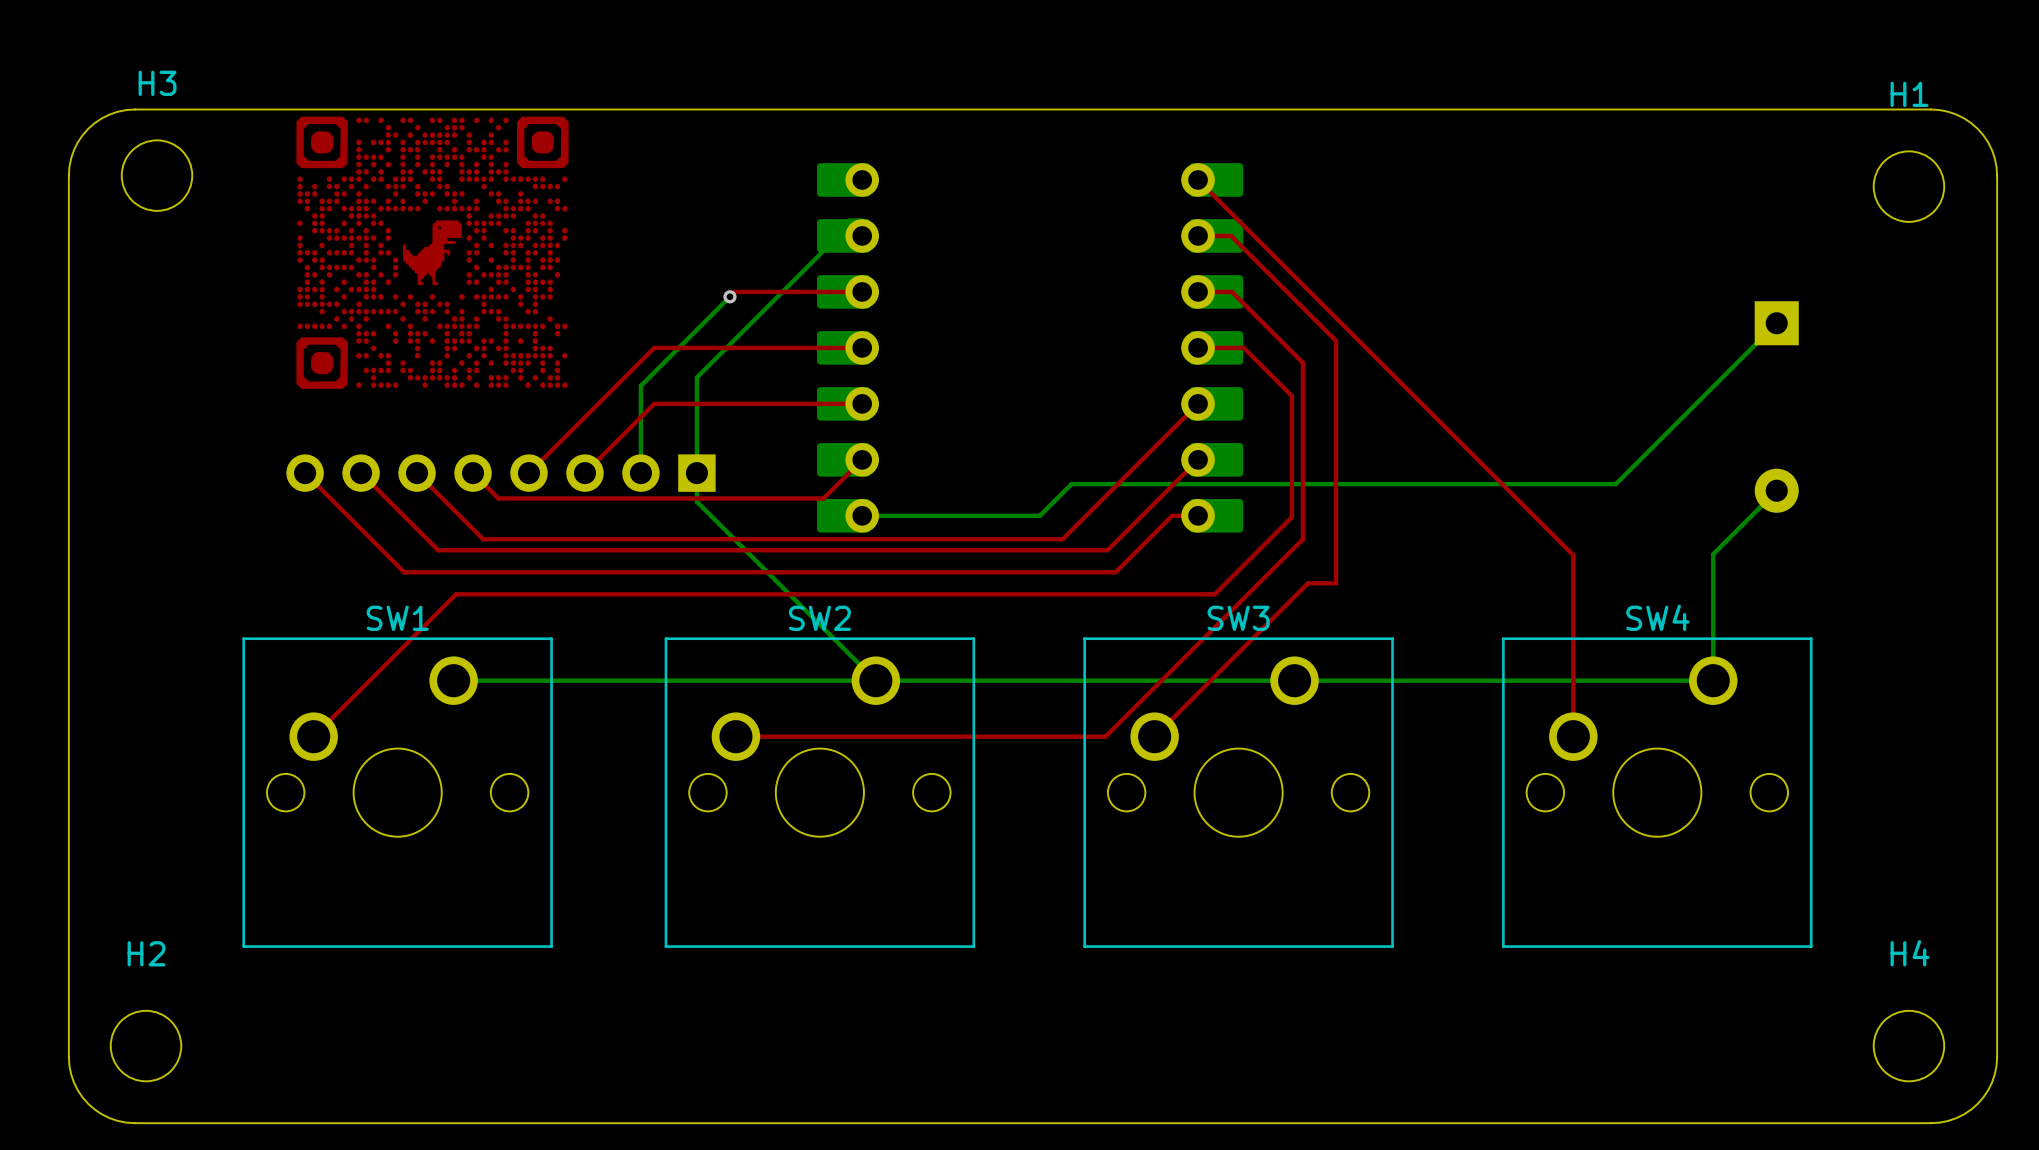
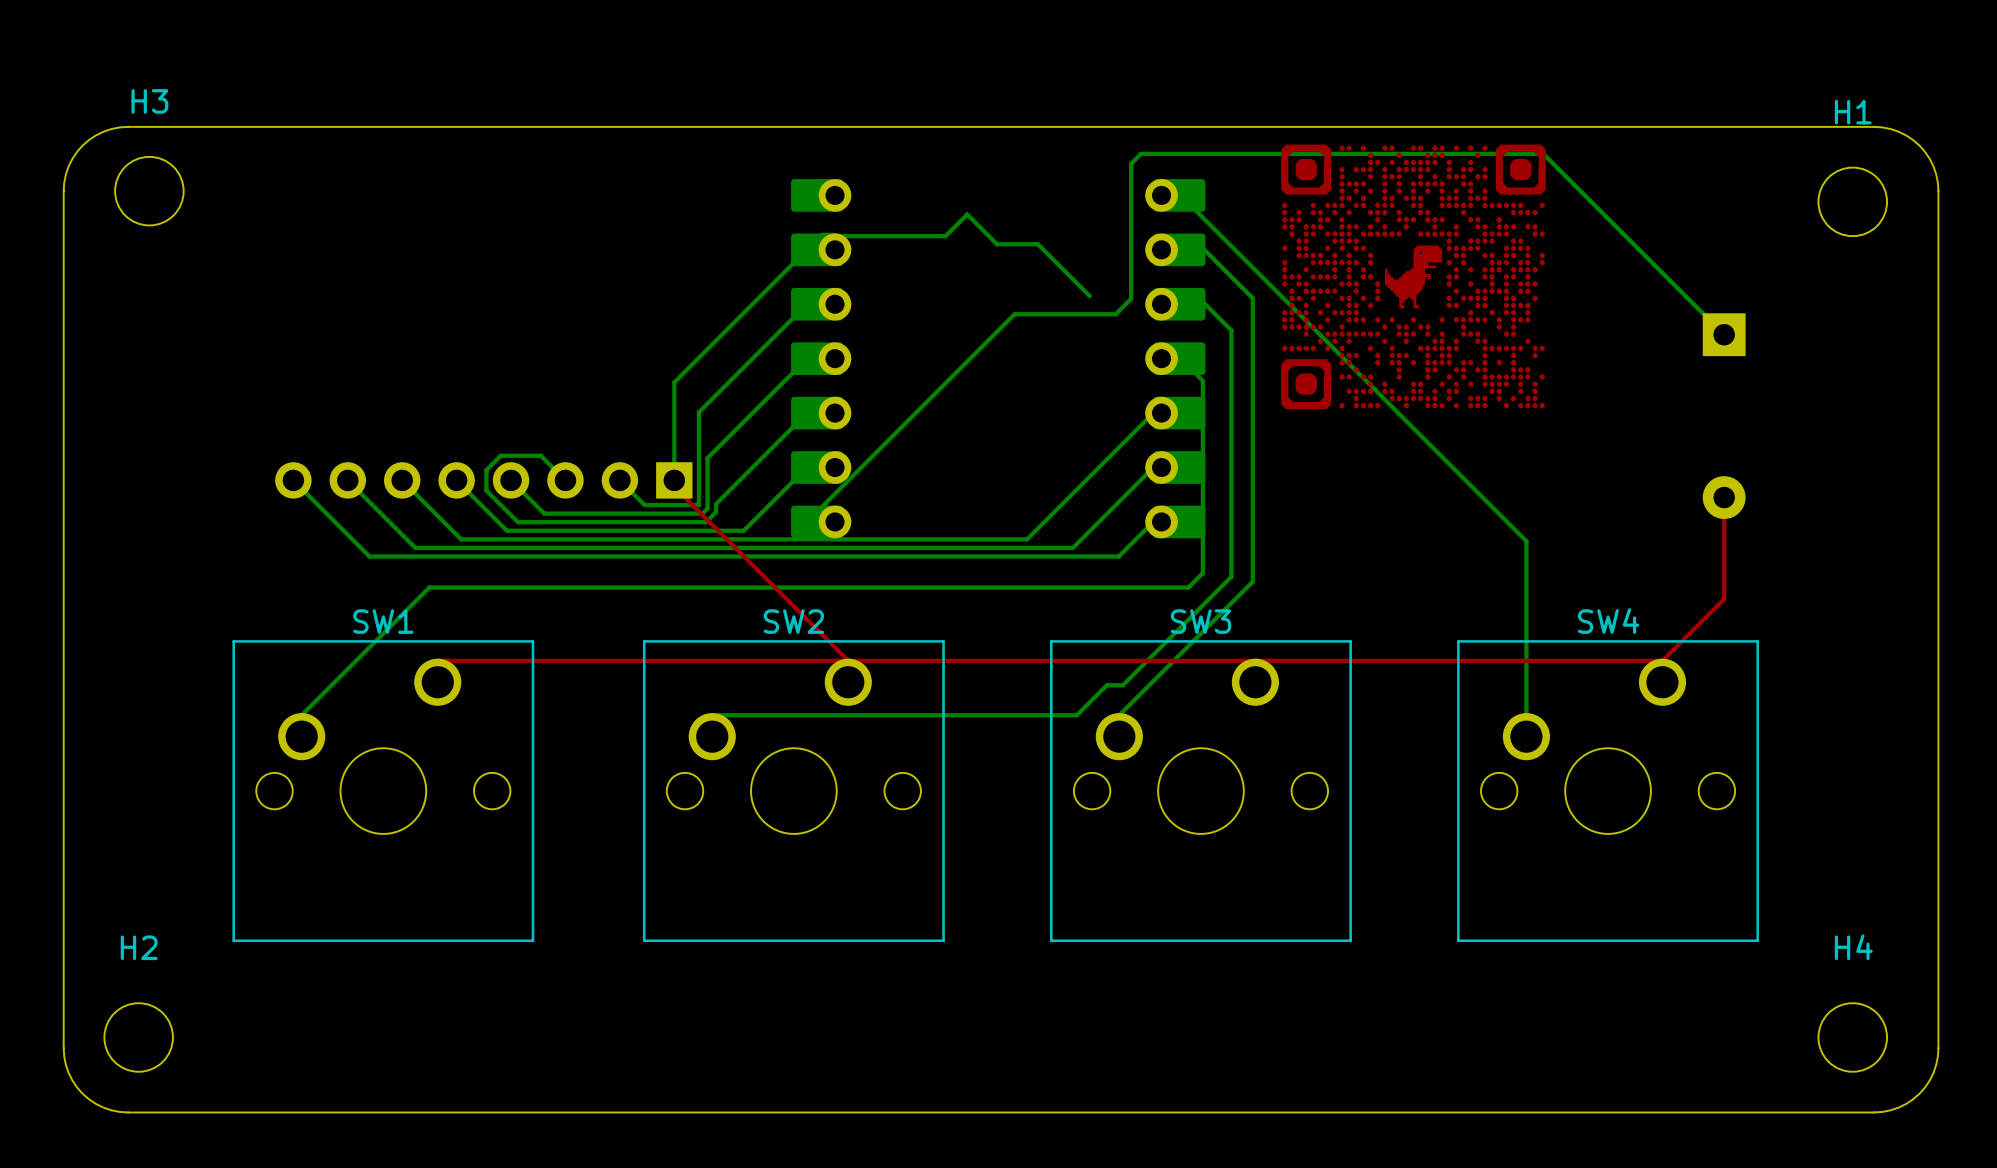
drawing: [296, 116, 569, 389] -> none
drawing: none -> [1281, 144, 1546, 410]
bottom track: none -> (1167, 181) (1526, 541) (1526, 715)
top track: (1198, 179) (1573, 555) (1573, 736) -> none
bottom track: none -> (1167, 236) (1190, 236) (1252, 298) (1252, 581) (1119, 715)
bottom track: (862, 235) (838, 235) (696, 377) -> (1089, 296) (1037, 244) (997, 244) (967, 214) (945, 236) (820, 236) (674, 382) (674, 387)
top track: (1198, 235) (1231, 235) (1336, 340) (1336, 583) (1308, 583) (1154, 736) -> none
bottom track: none -> (1167, 290) (1191, 290) (1231, 330) (1231, 576) (1122, 685) (1106, 685) (1076, 715) (712, 715)
top track: (862, 291) (734, 291) (729, 296) -> none
top track: (1198, 291) (1231, 291) (1302, 362) (1302, 539) (1105, 736) (735, 736) -> none
bottom track: (729, 296) (640, 385) (640, 473) -> (820, 290) (698, 412) (698, 505) (644, 505) (619, 480)
via: (729, 296) -> none
bottom track: (1776, 323) (1615, 484) (1071, 484) (1039, 515) (862, 515) -> (1724, 334) (1543, 153) (1141, 153) (1131, 163) (1131, 298) (1115, 314) (1014, 314) (820, 508)
bottom track: none -> (820, 345) (707, 458) (707, 508) (702, 513) (544, 513) (511, 480)
bottom track: none -> (1167, 345) (1202, 380) (1202, 573) (1188, 587) (429, 587) (301, 715)
top track: (862, 347) (654, 347) (529, 473) -> none
top track: (1198, 347) (1243, 347) (1291, 395) (1291, 517) (1214, 594) (456, 594) (313, 736) -> none
bottom track: none -> (820, 399) (716, 503) (716, 512) (706, 522) (517, 522) (486, 490) (486, 470) (500, 455) (540, 455) (565, 480)
bottom track: none -> (1167, 399) (1027, 539) (461, 539) (402, 480)
top track: (862, 403) (654, 403) (584, 473) -> none
top track: (1198, 403) (1062, 539) (483, 539) (417, 473) -> none
bottom track: none -> (820, 453) (743, 530) (506, 530) (456, 480)
bottom track: none -> (1167, 453) (1072, 547) (415, 547) (347, 480)
top track: (862, 459) (823, 498) (498, 498) (473, 473) -> none
top track: (1198, 459) (1107, 550) (438, 550) (361, 473) -> none
bottom track: none -> (293, 480) (369, 556) (1118, 556) (1167, 508)
top track: (305, 473) (404, 572) (1115, 572) (1172, 515) (1198, 515) -> none
bottom track: (696, 473) (696, 501) (875, 680) -> none
top track: none -> (674, 480) (674, 486) (848, 660)
bottom track: (1776, 490) (1713, 554) (1713, 680) (453, 680) -> none
top track: none -> (1724, 497) (1724, 599) (1662, 660) (437, 660)

